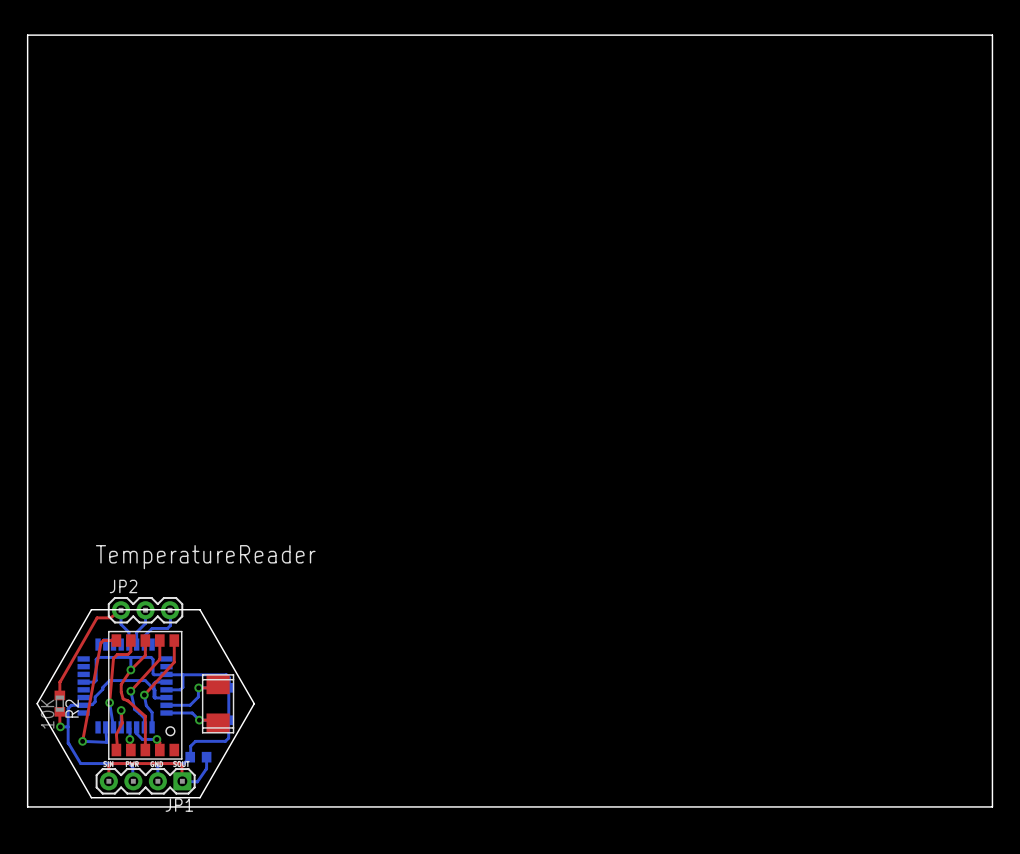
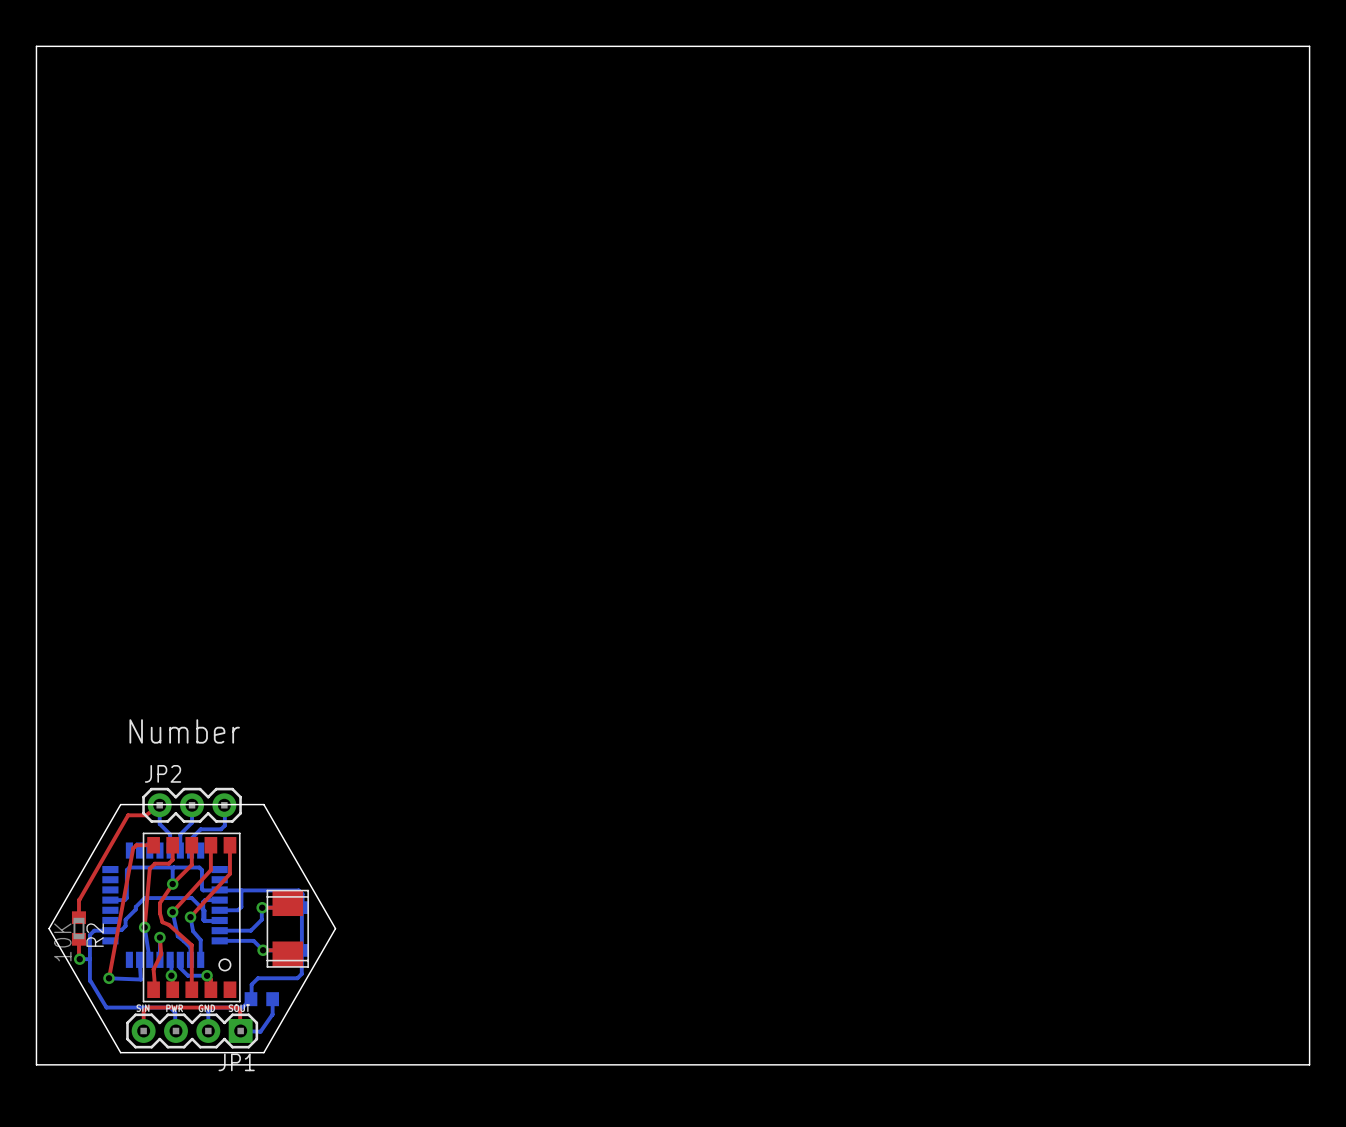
text: TemperatureReader (205, 557) -> Number (184, 731)

